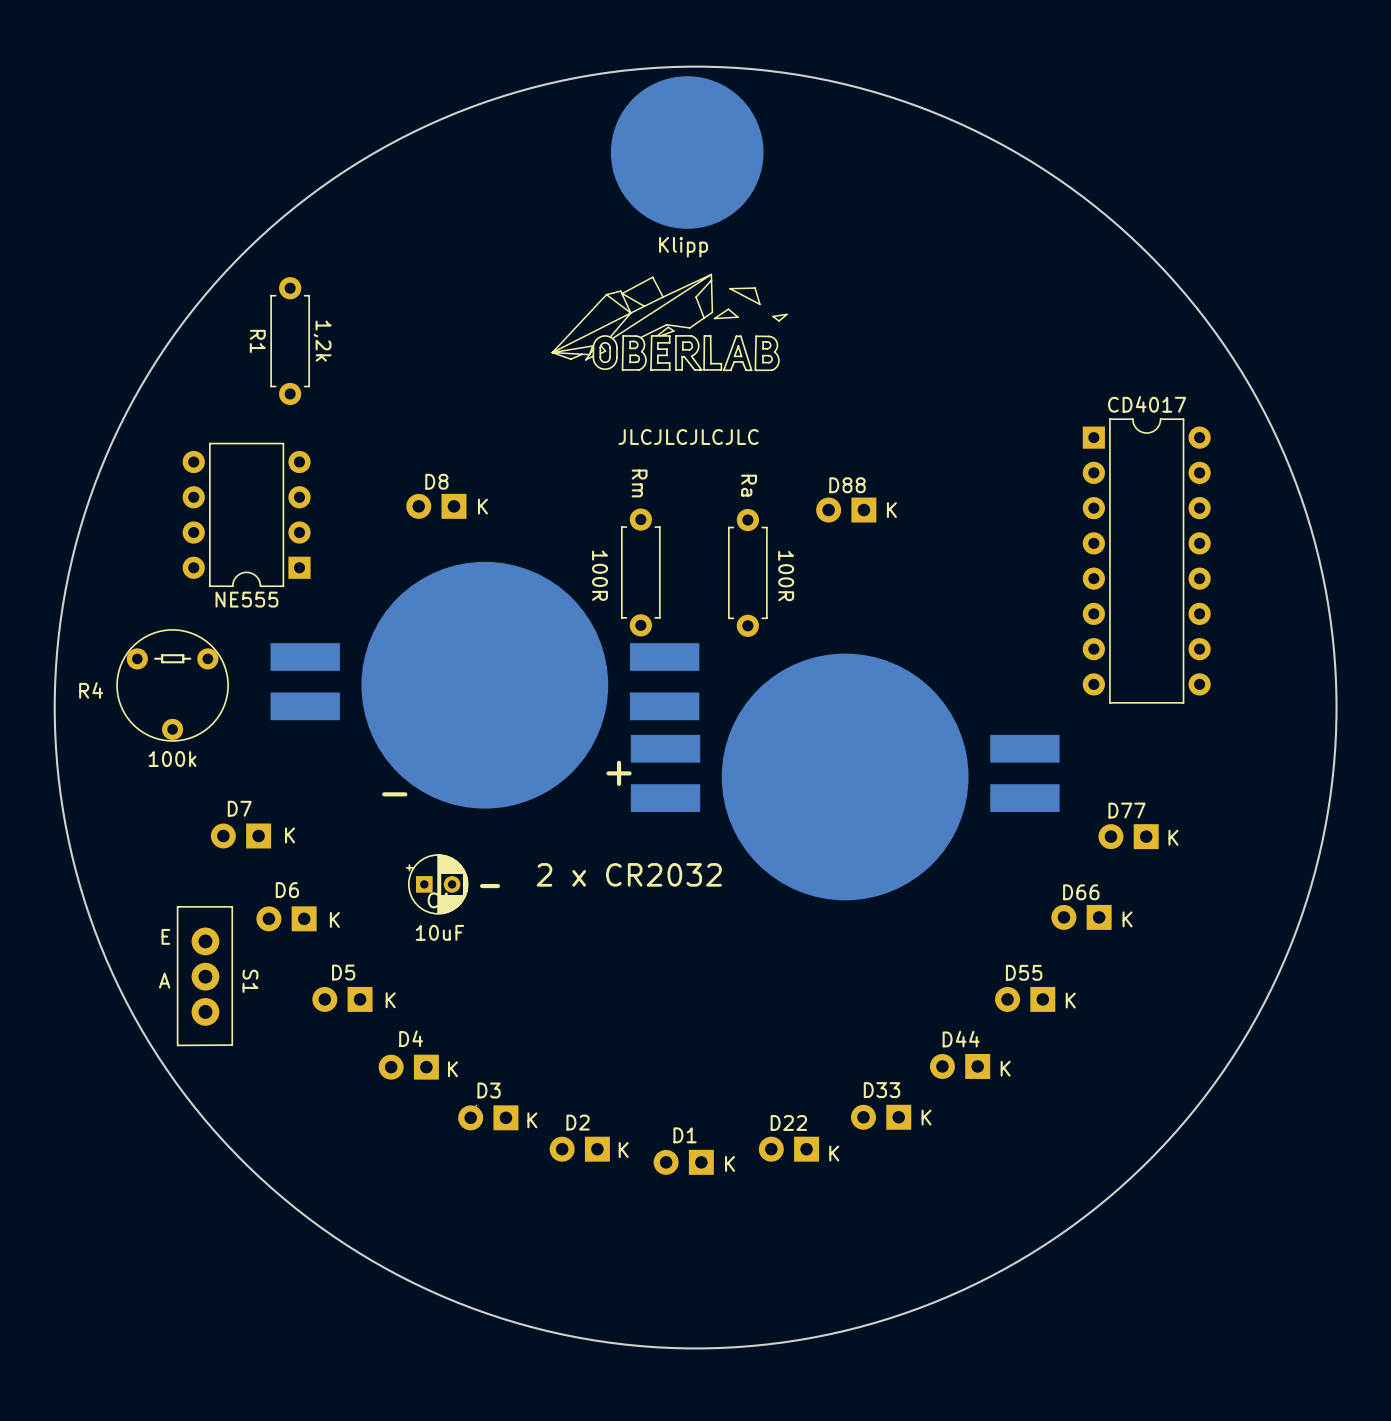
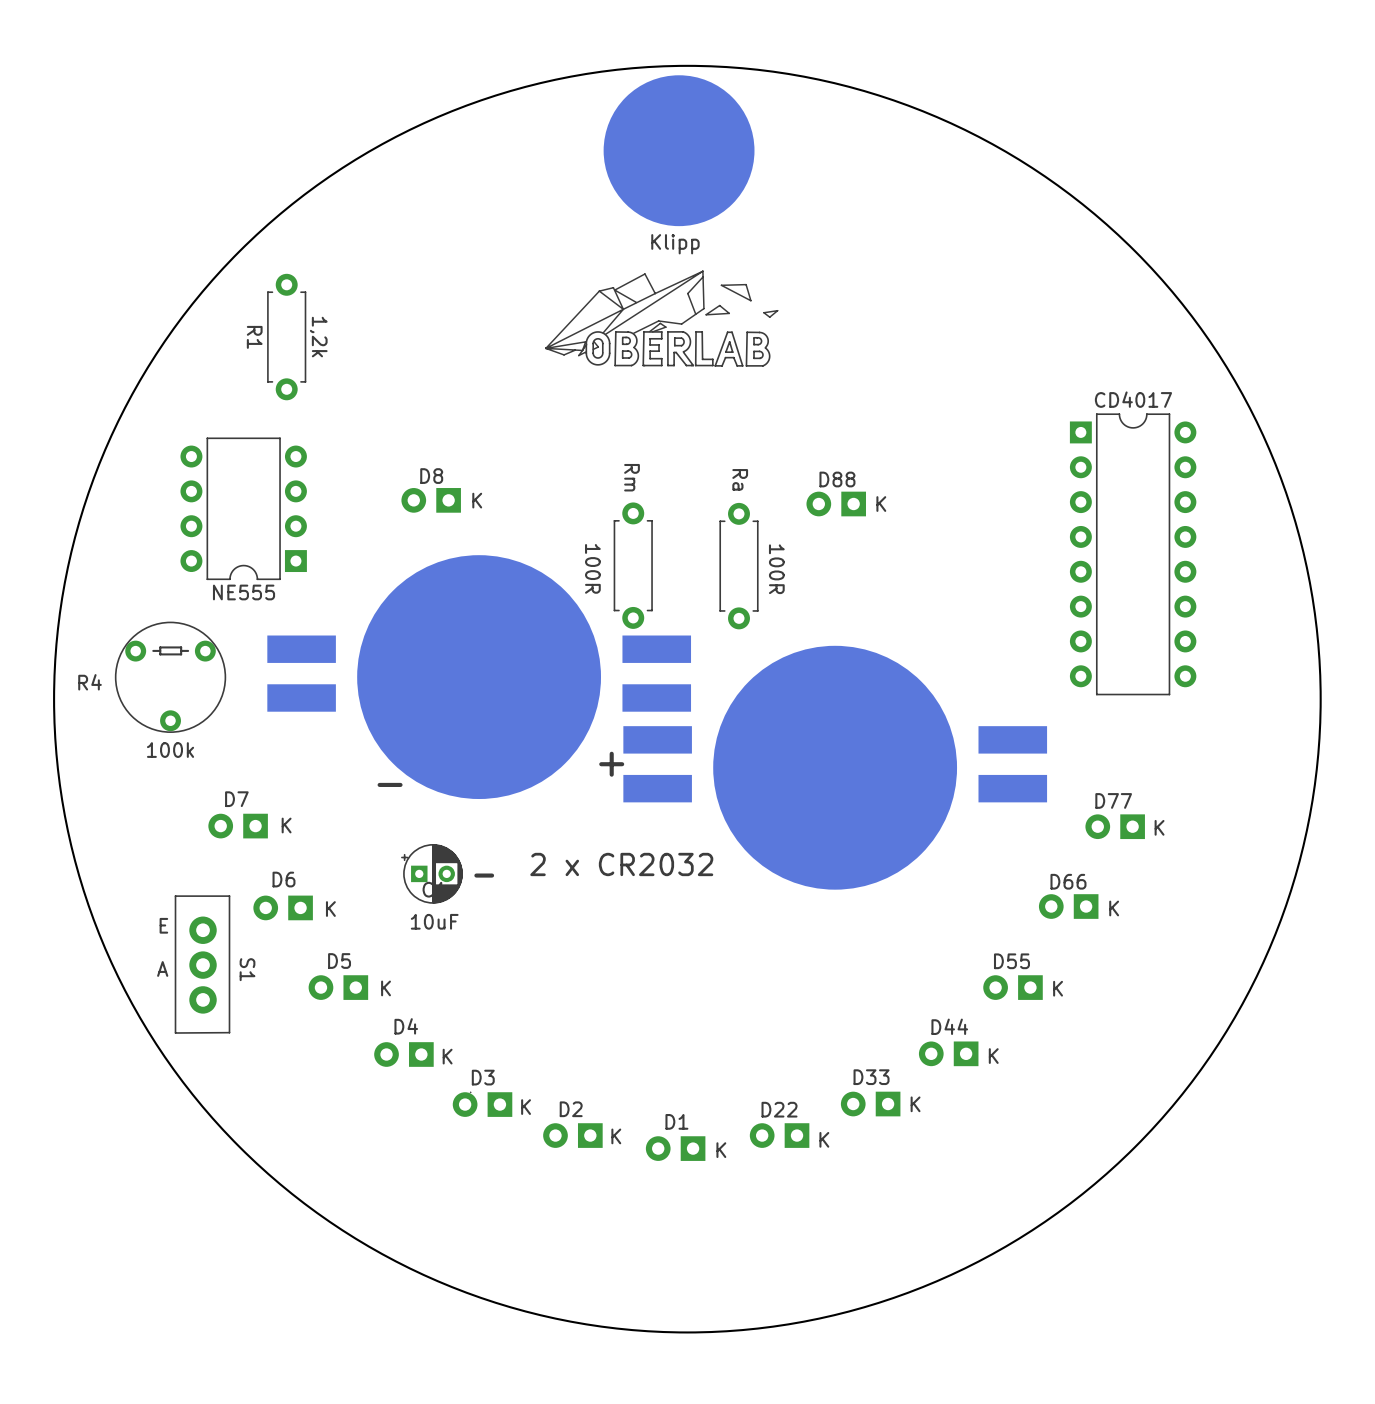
text: JLCJLCJLCJLC (688, 437) -> none

